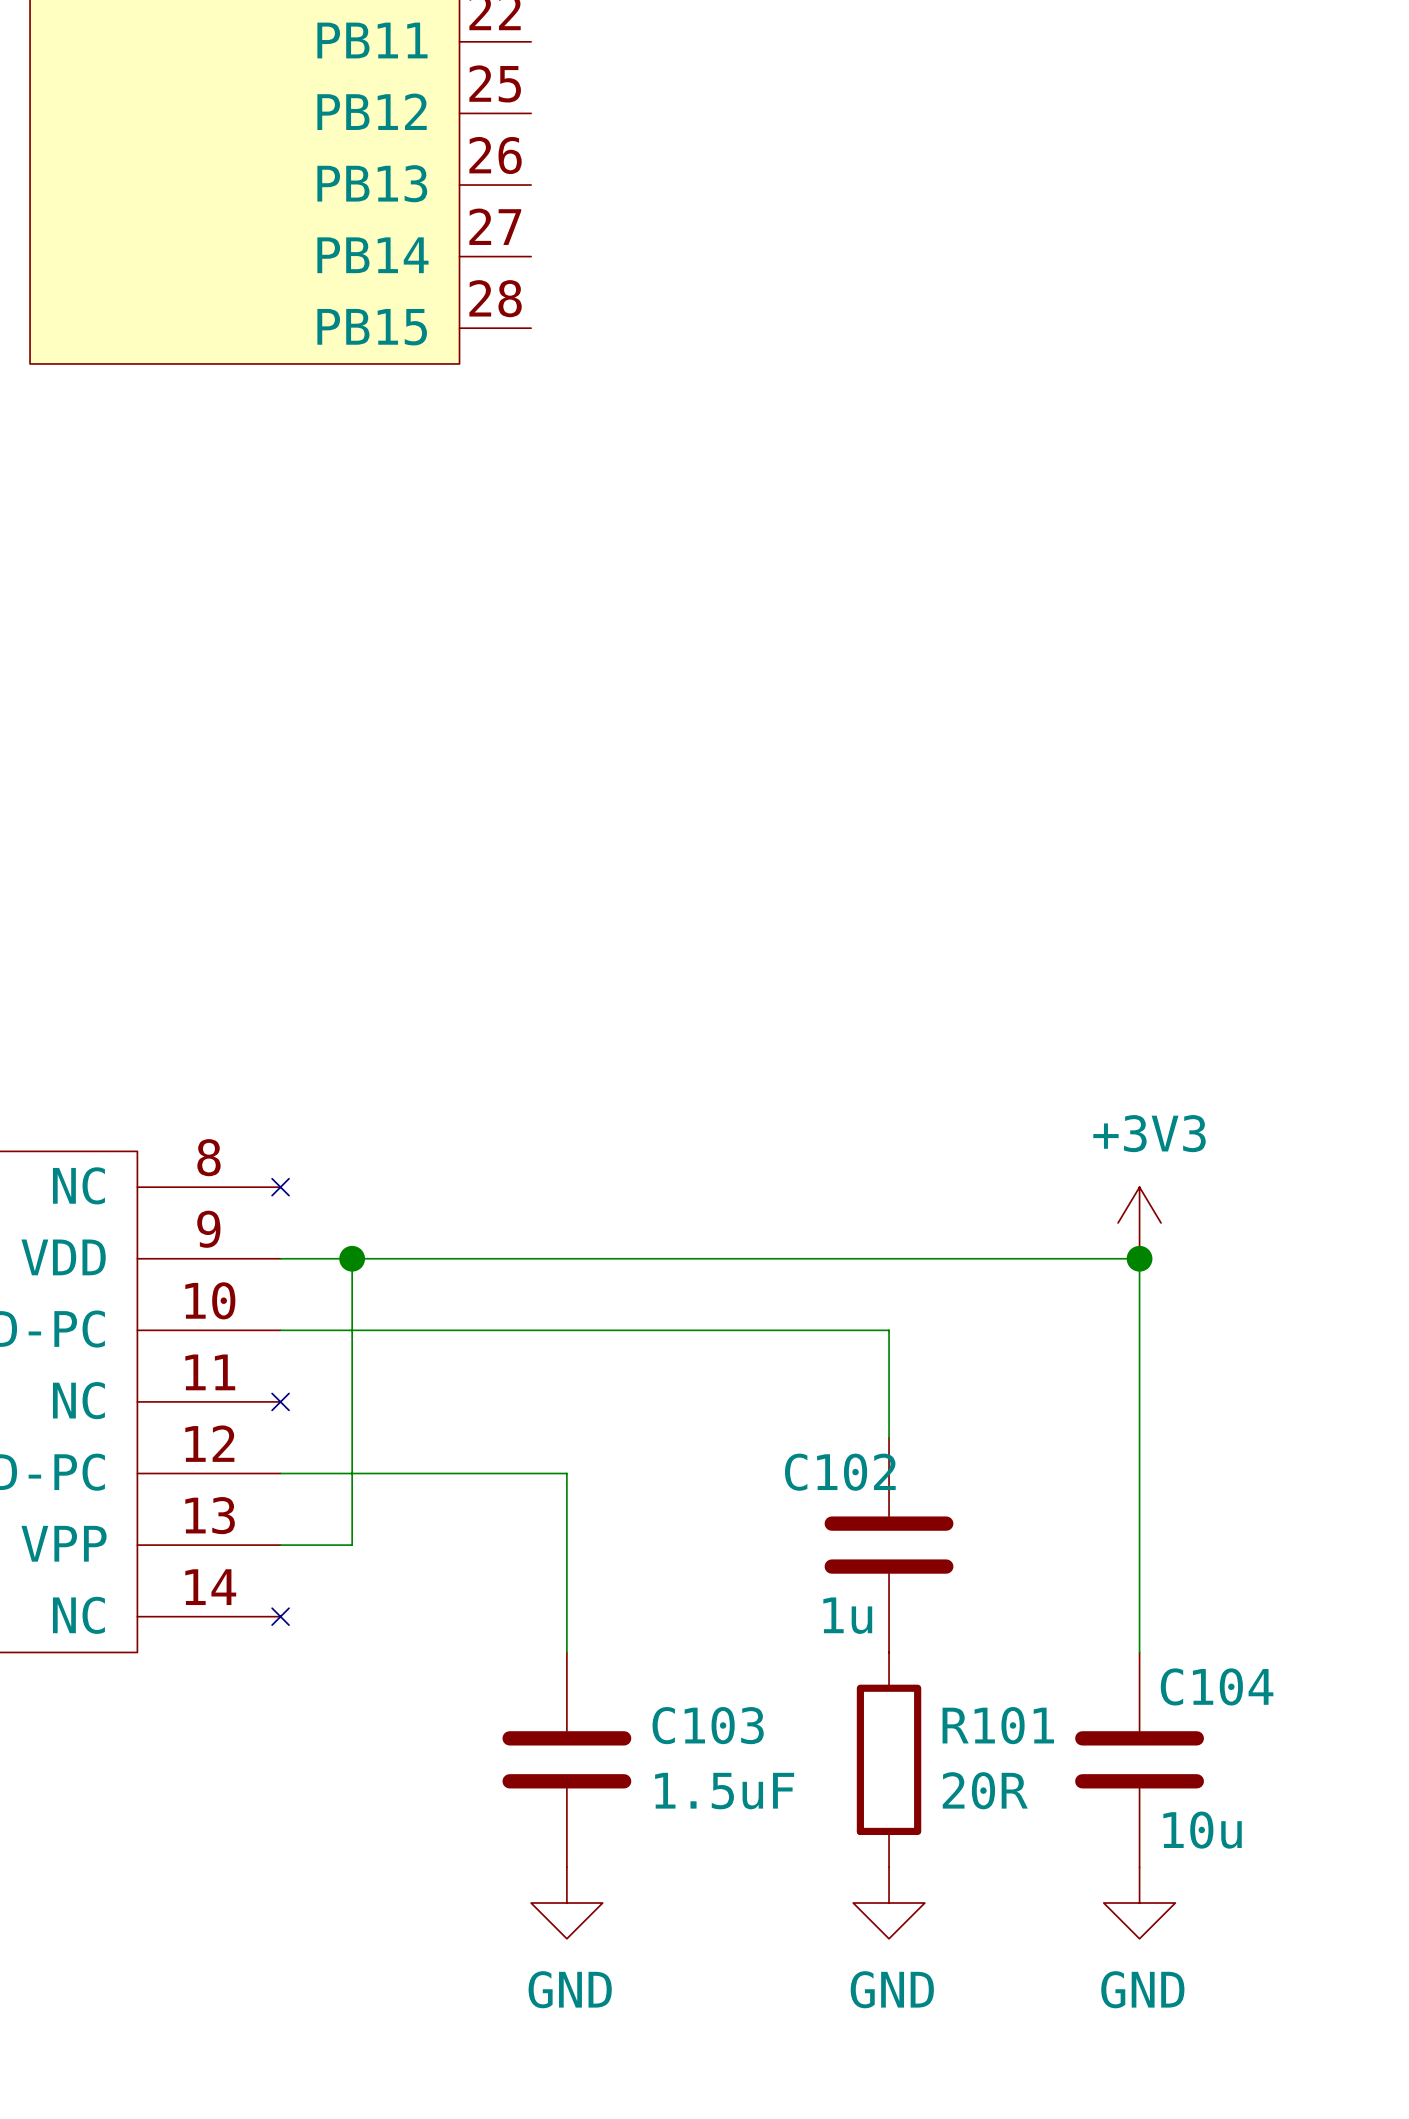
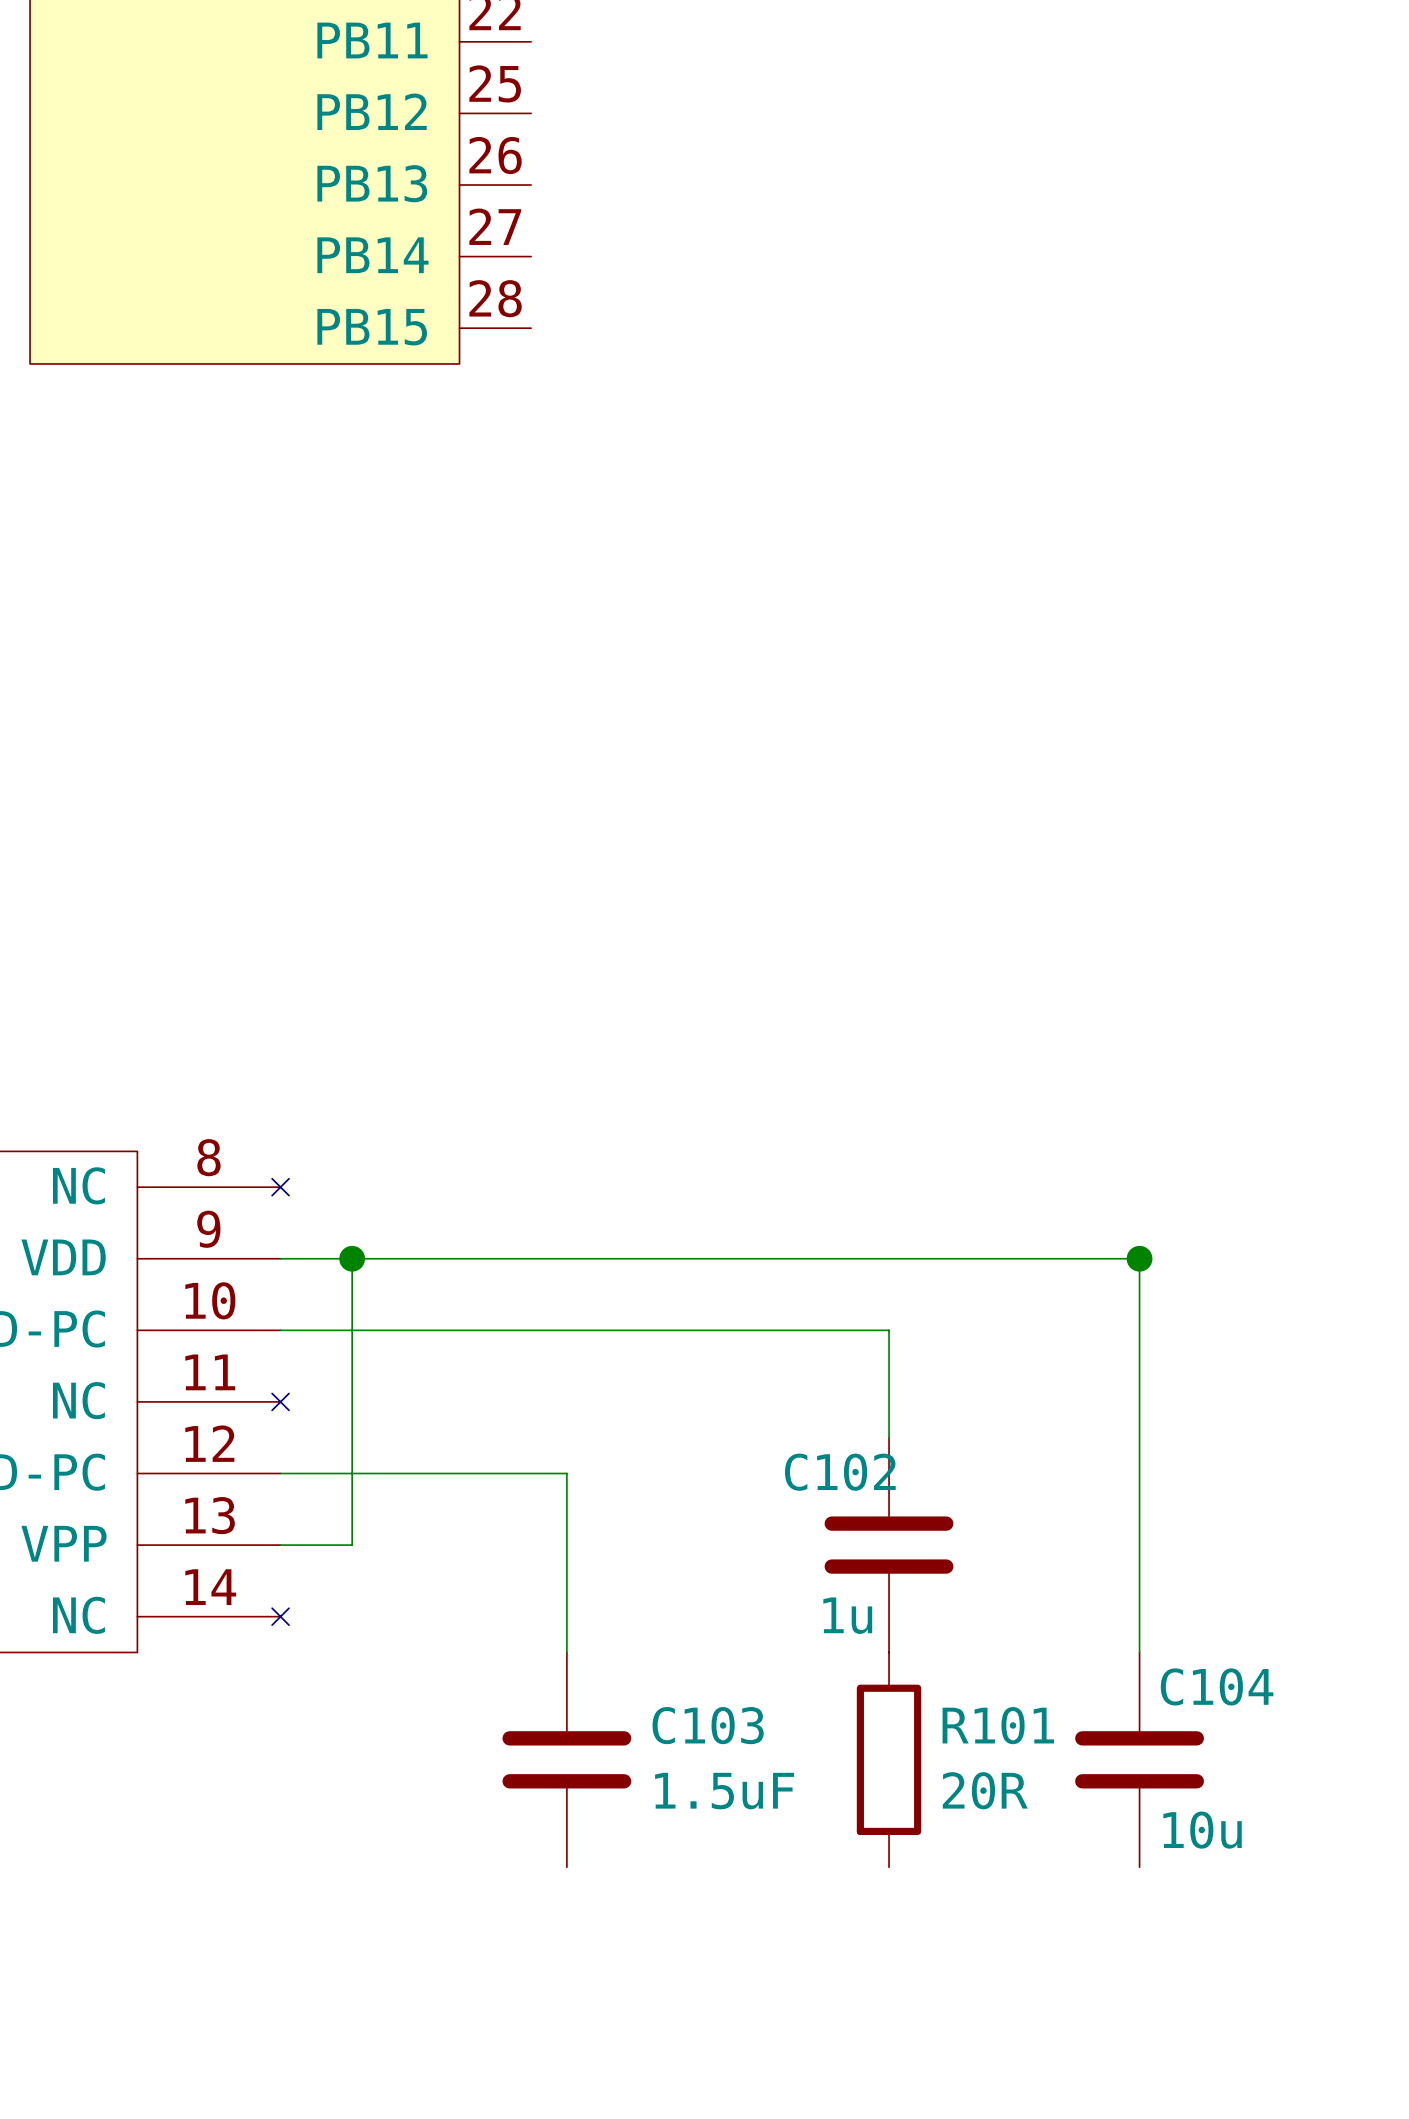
power symbol: +3V3 (1139, 1222) -> none
power symbol: GND (566, 1903) -> none
power symbol: GND (889, 1903) -> none
power symbol: GND (1139, 1903) -> none

